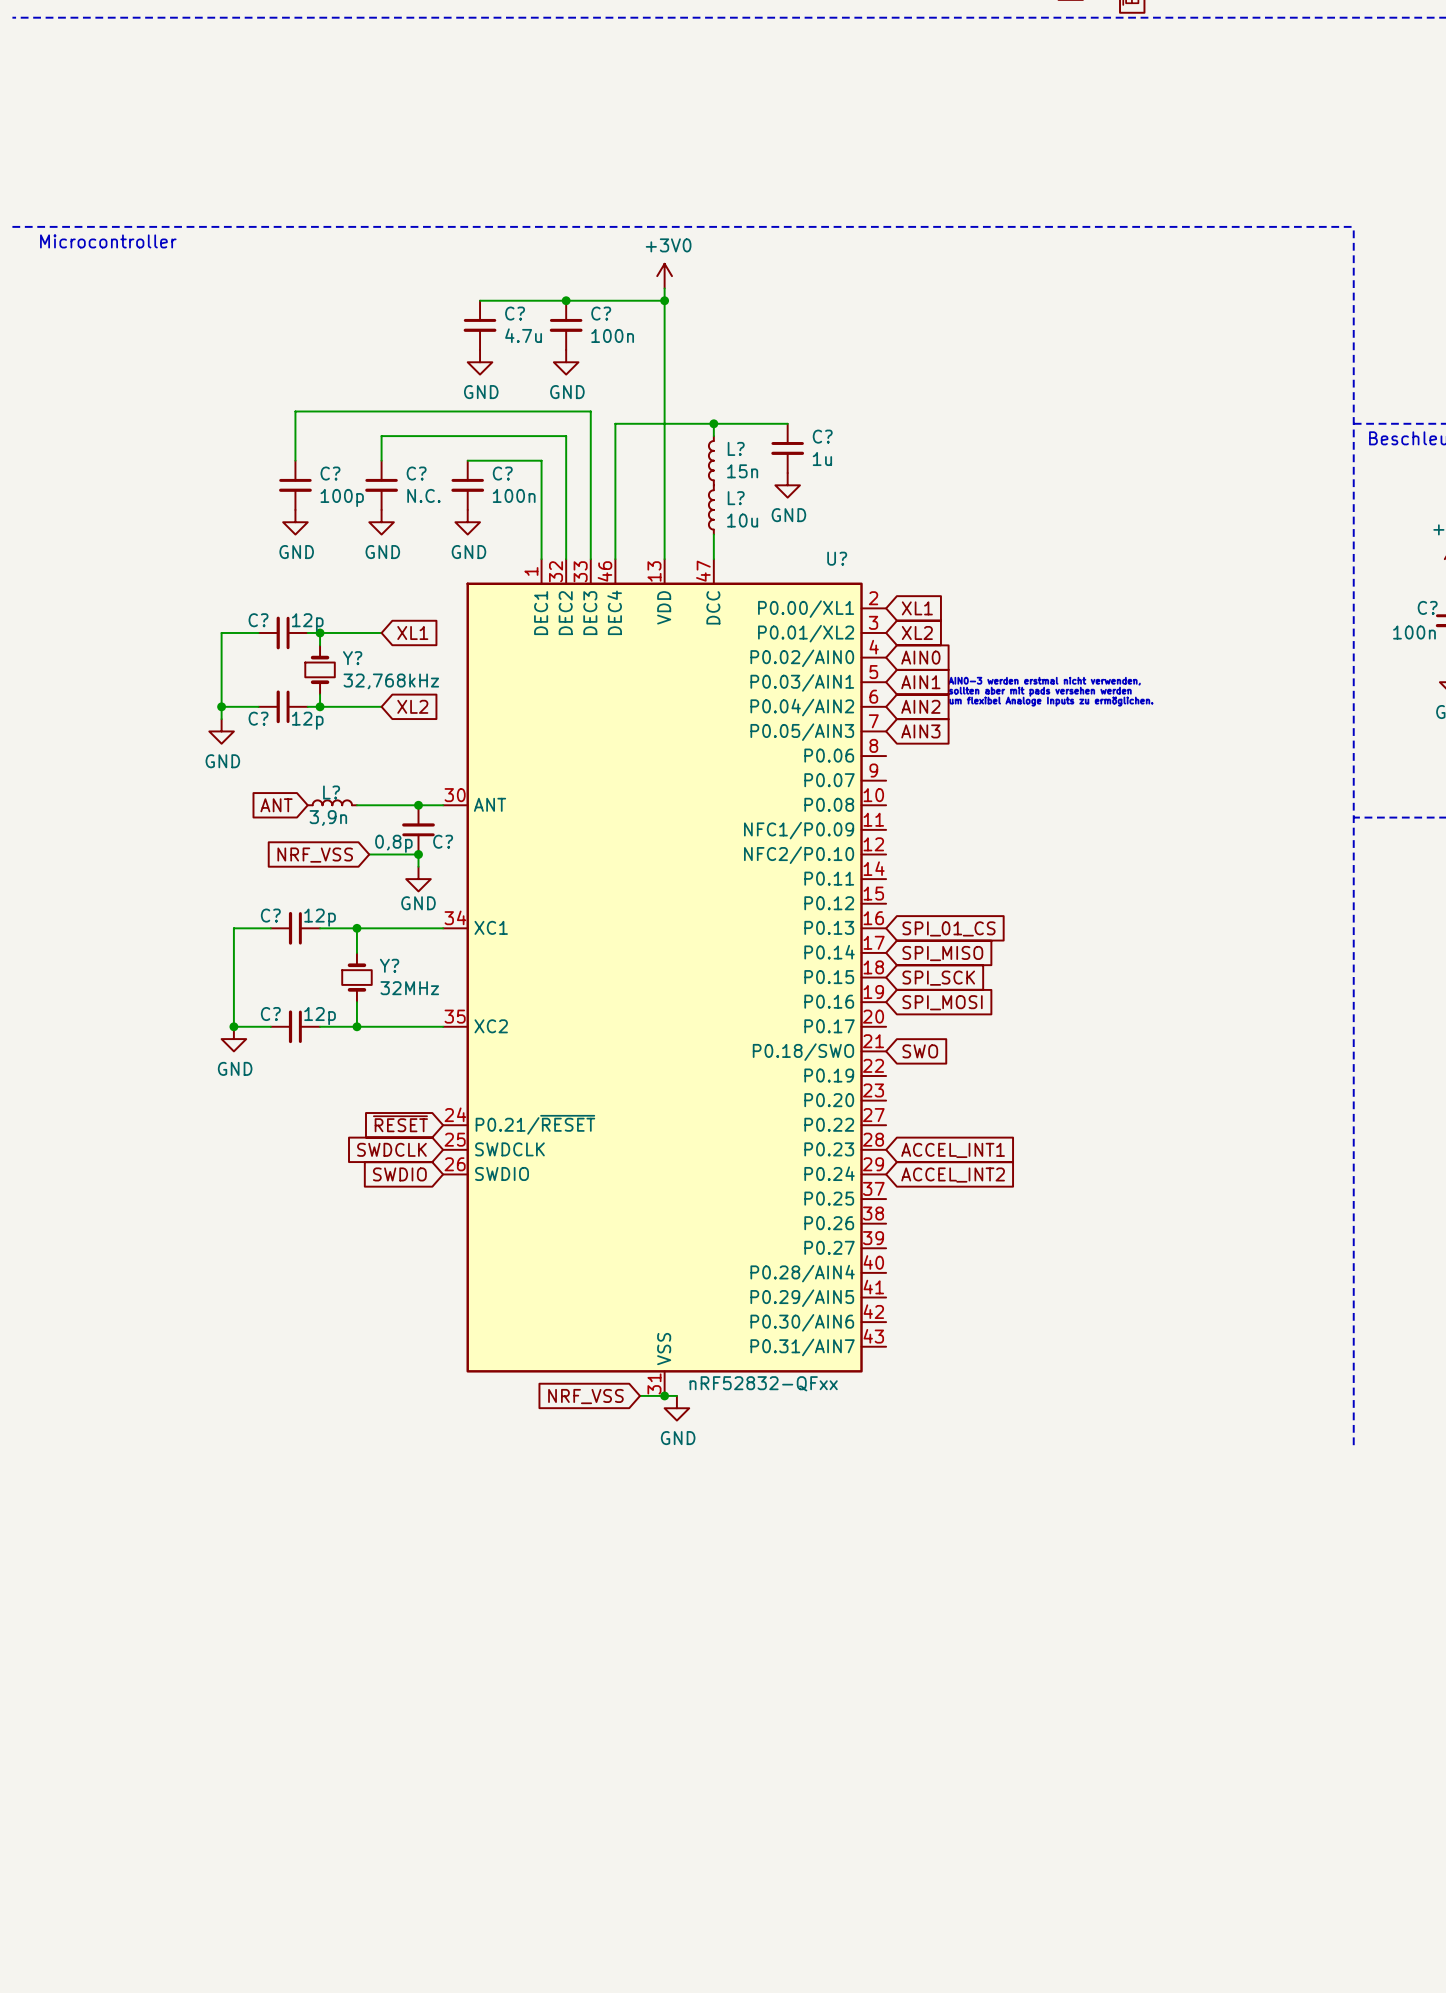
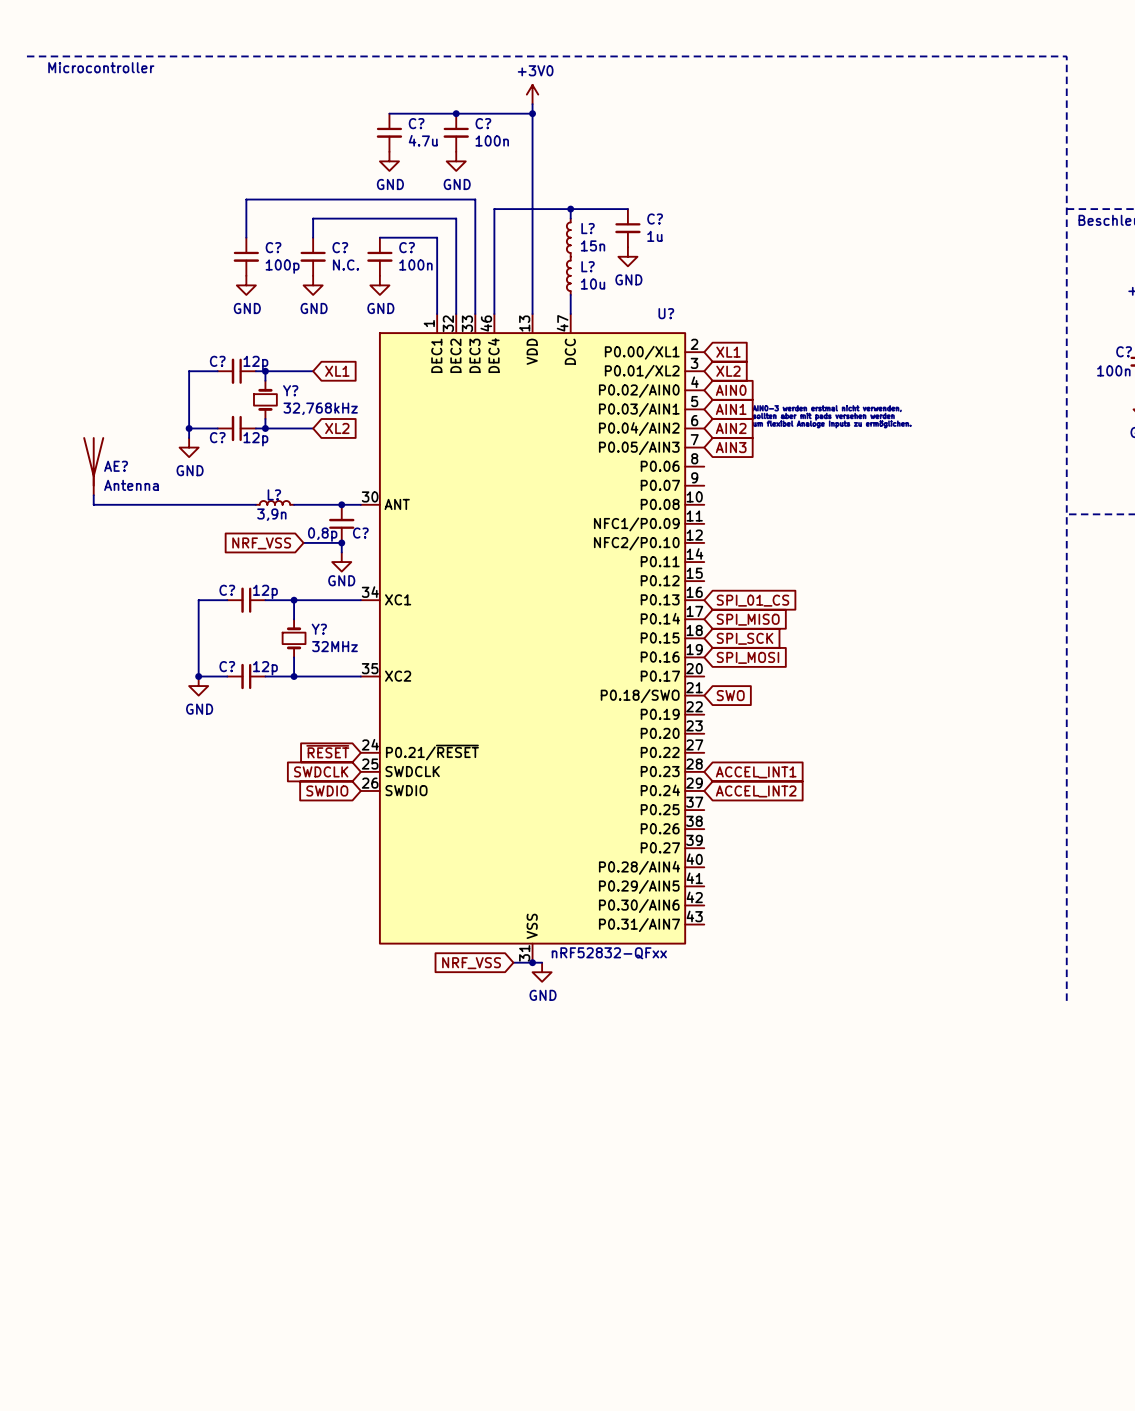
AE?: none -> Antenna (93, 466)
wire: none -> (93, 495) (93, 504) (255, 504)
global label: ANT (276, 805) -> none

